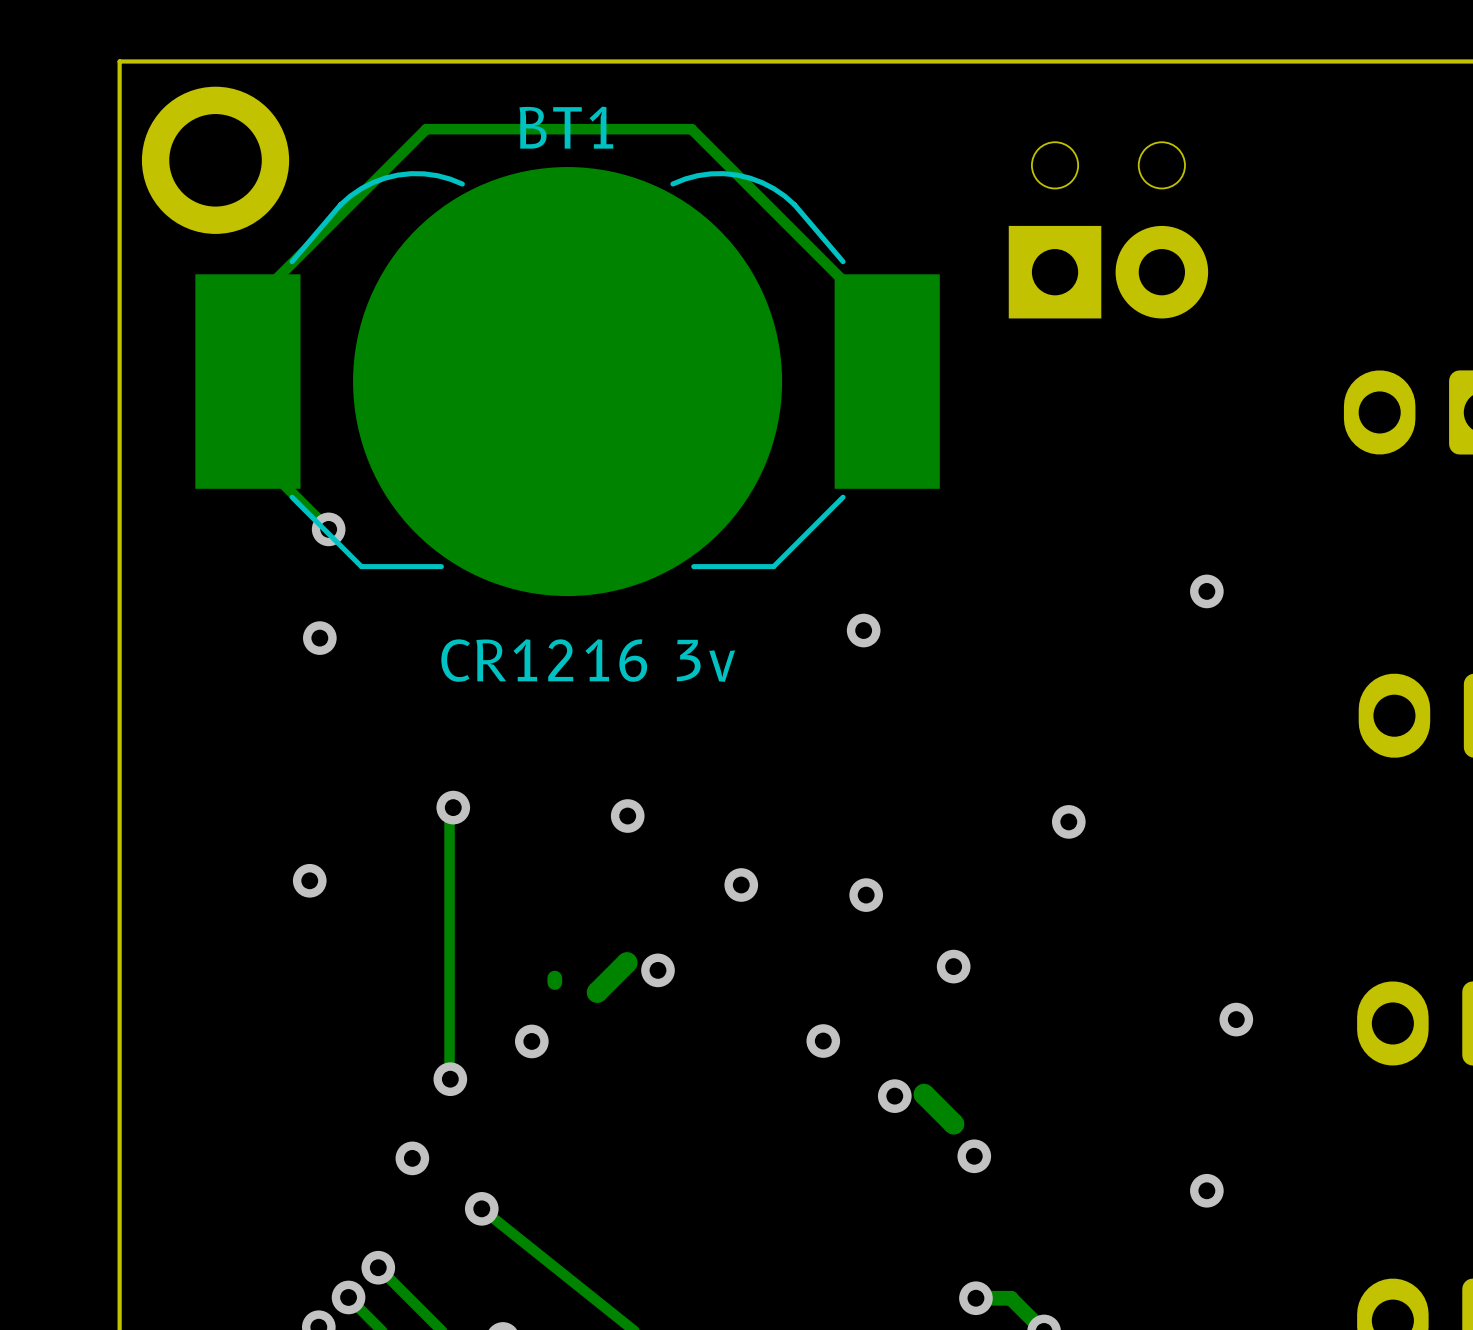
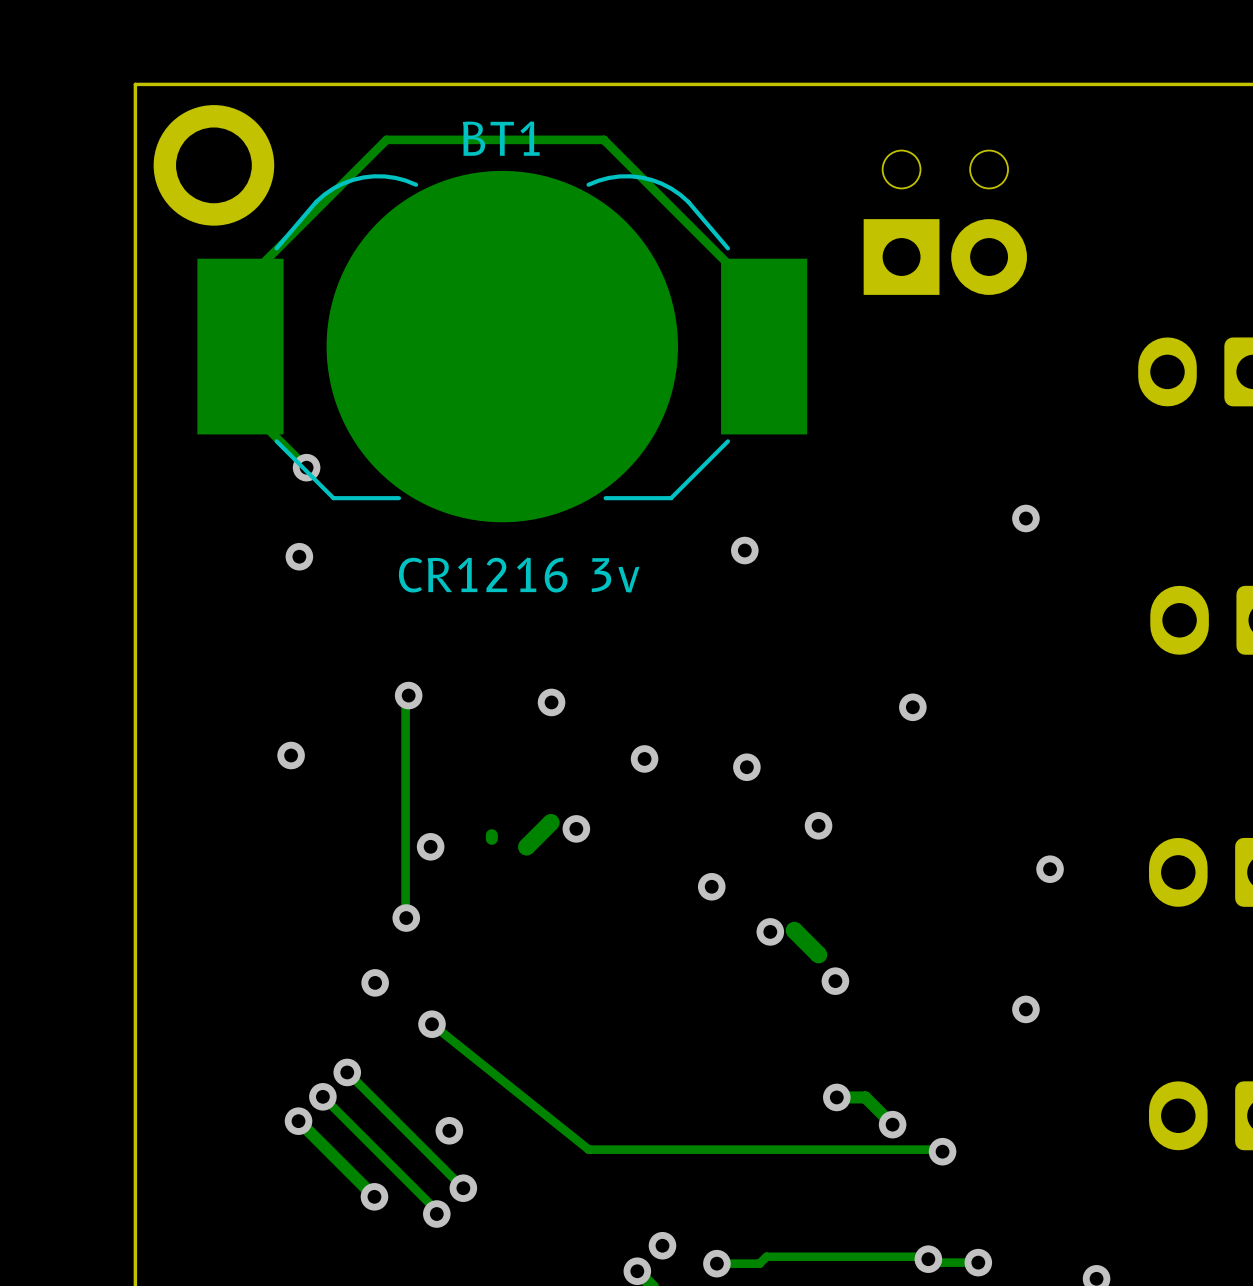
via position: (531, 1041) -> (430, 846)

